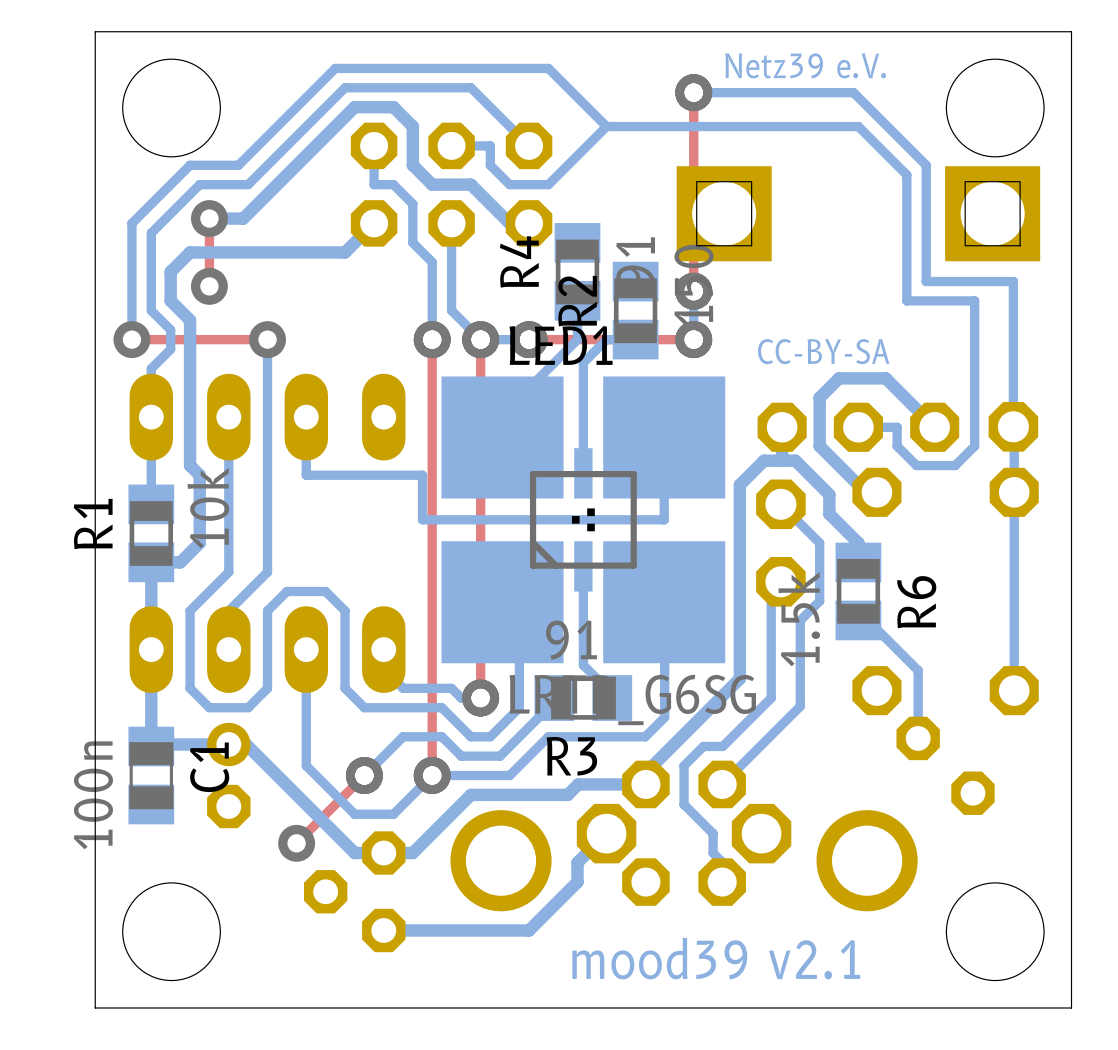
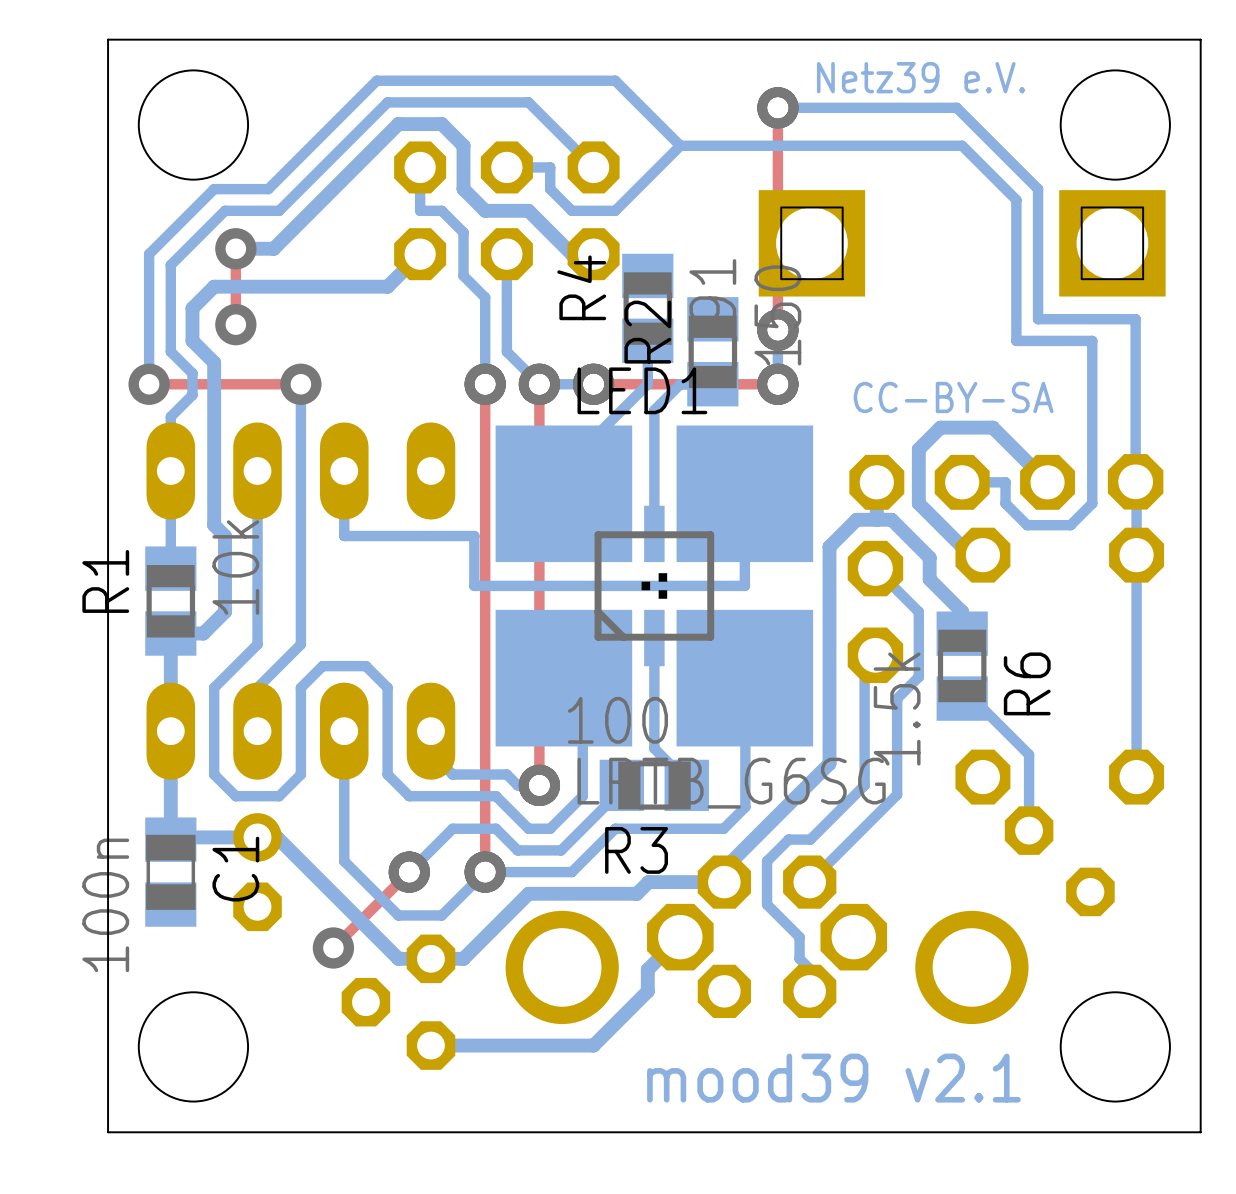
R3 value: 91 (571, 640) -> 100 (617, 720)

